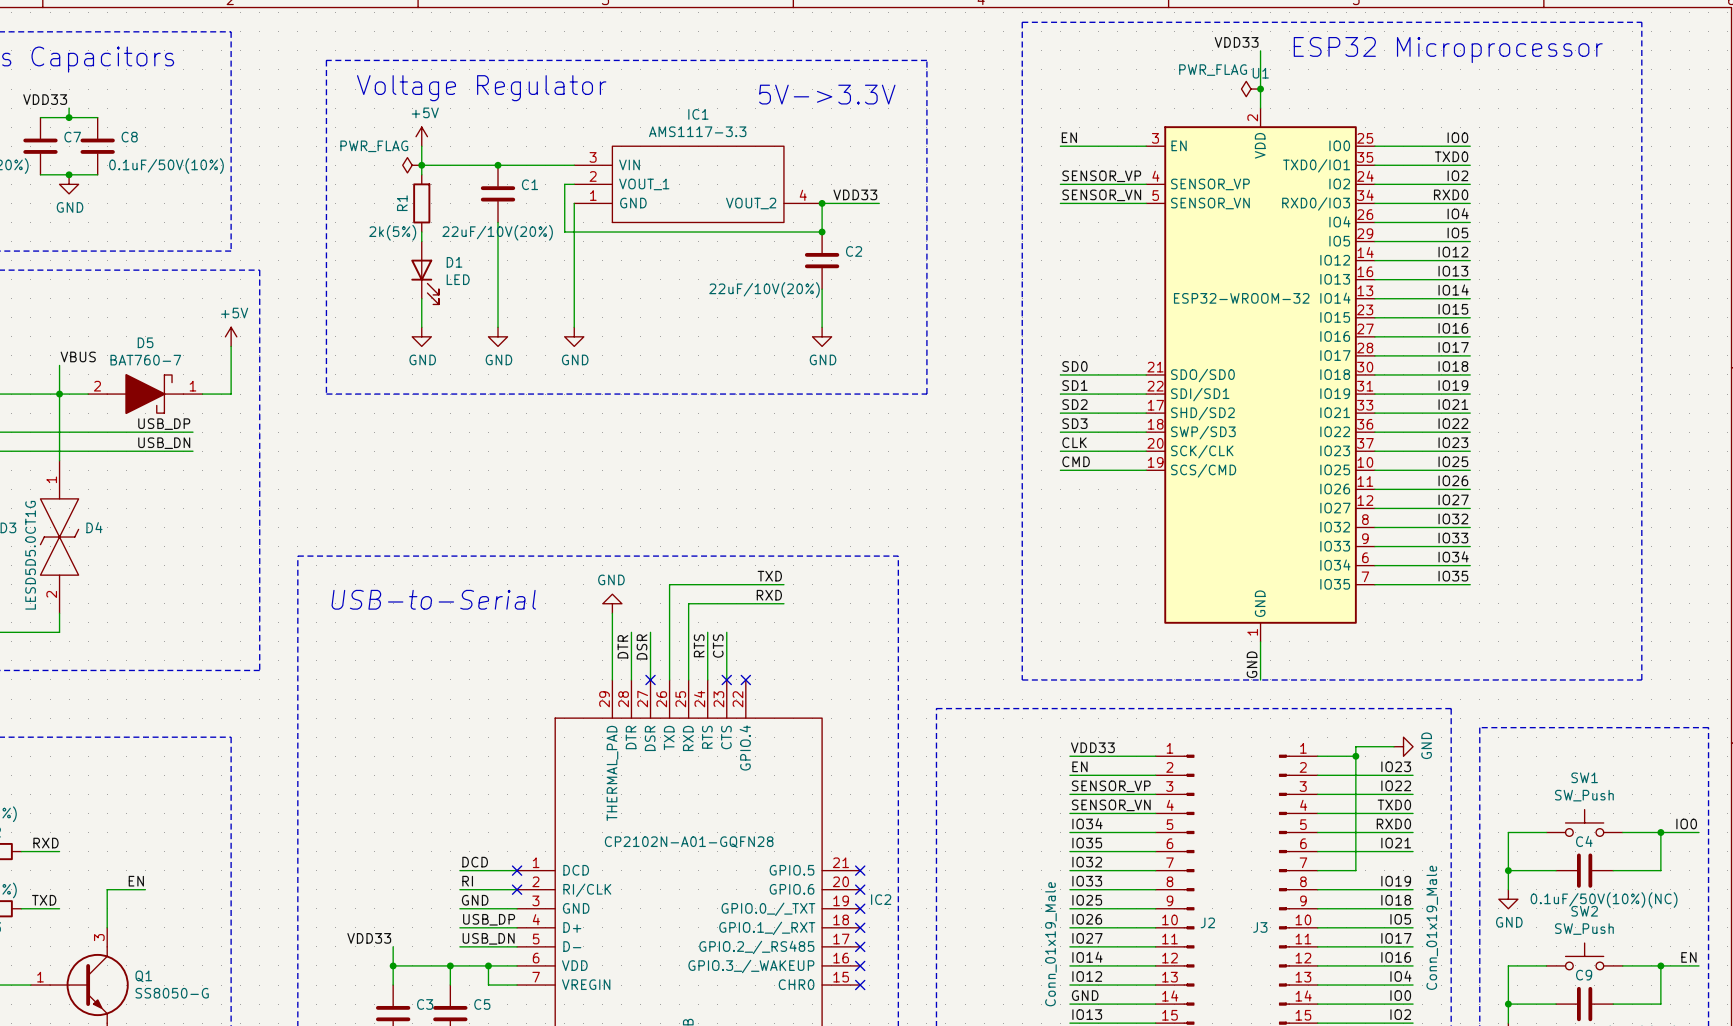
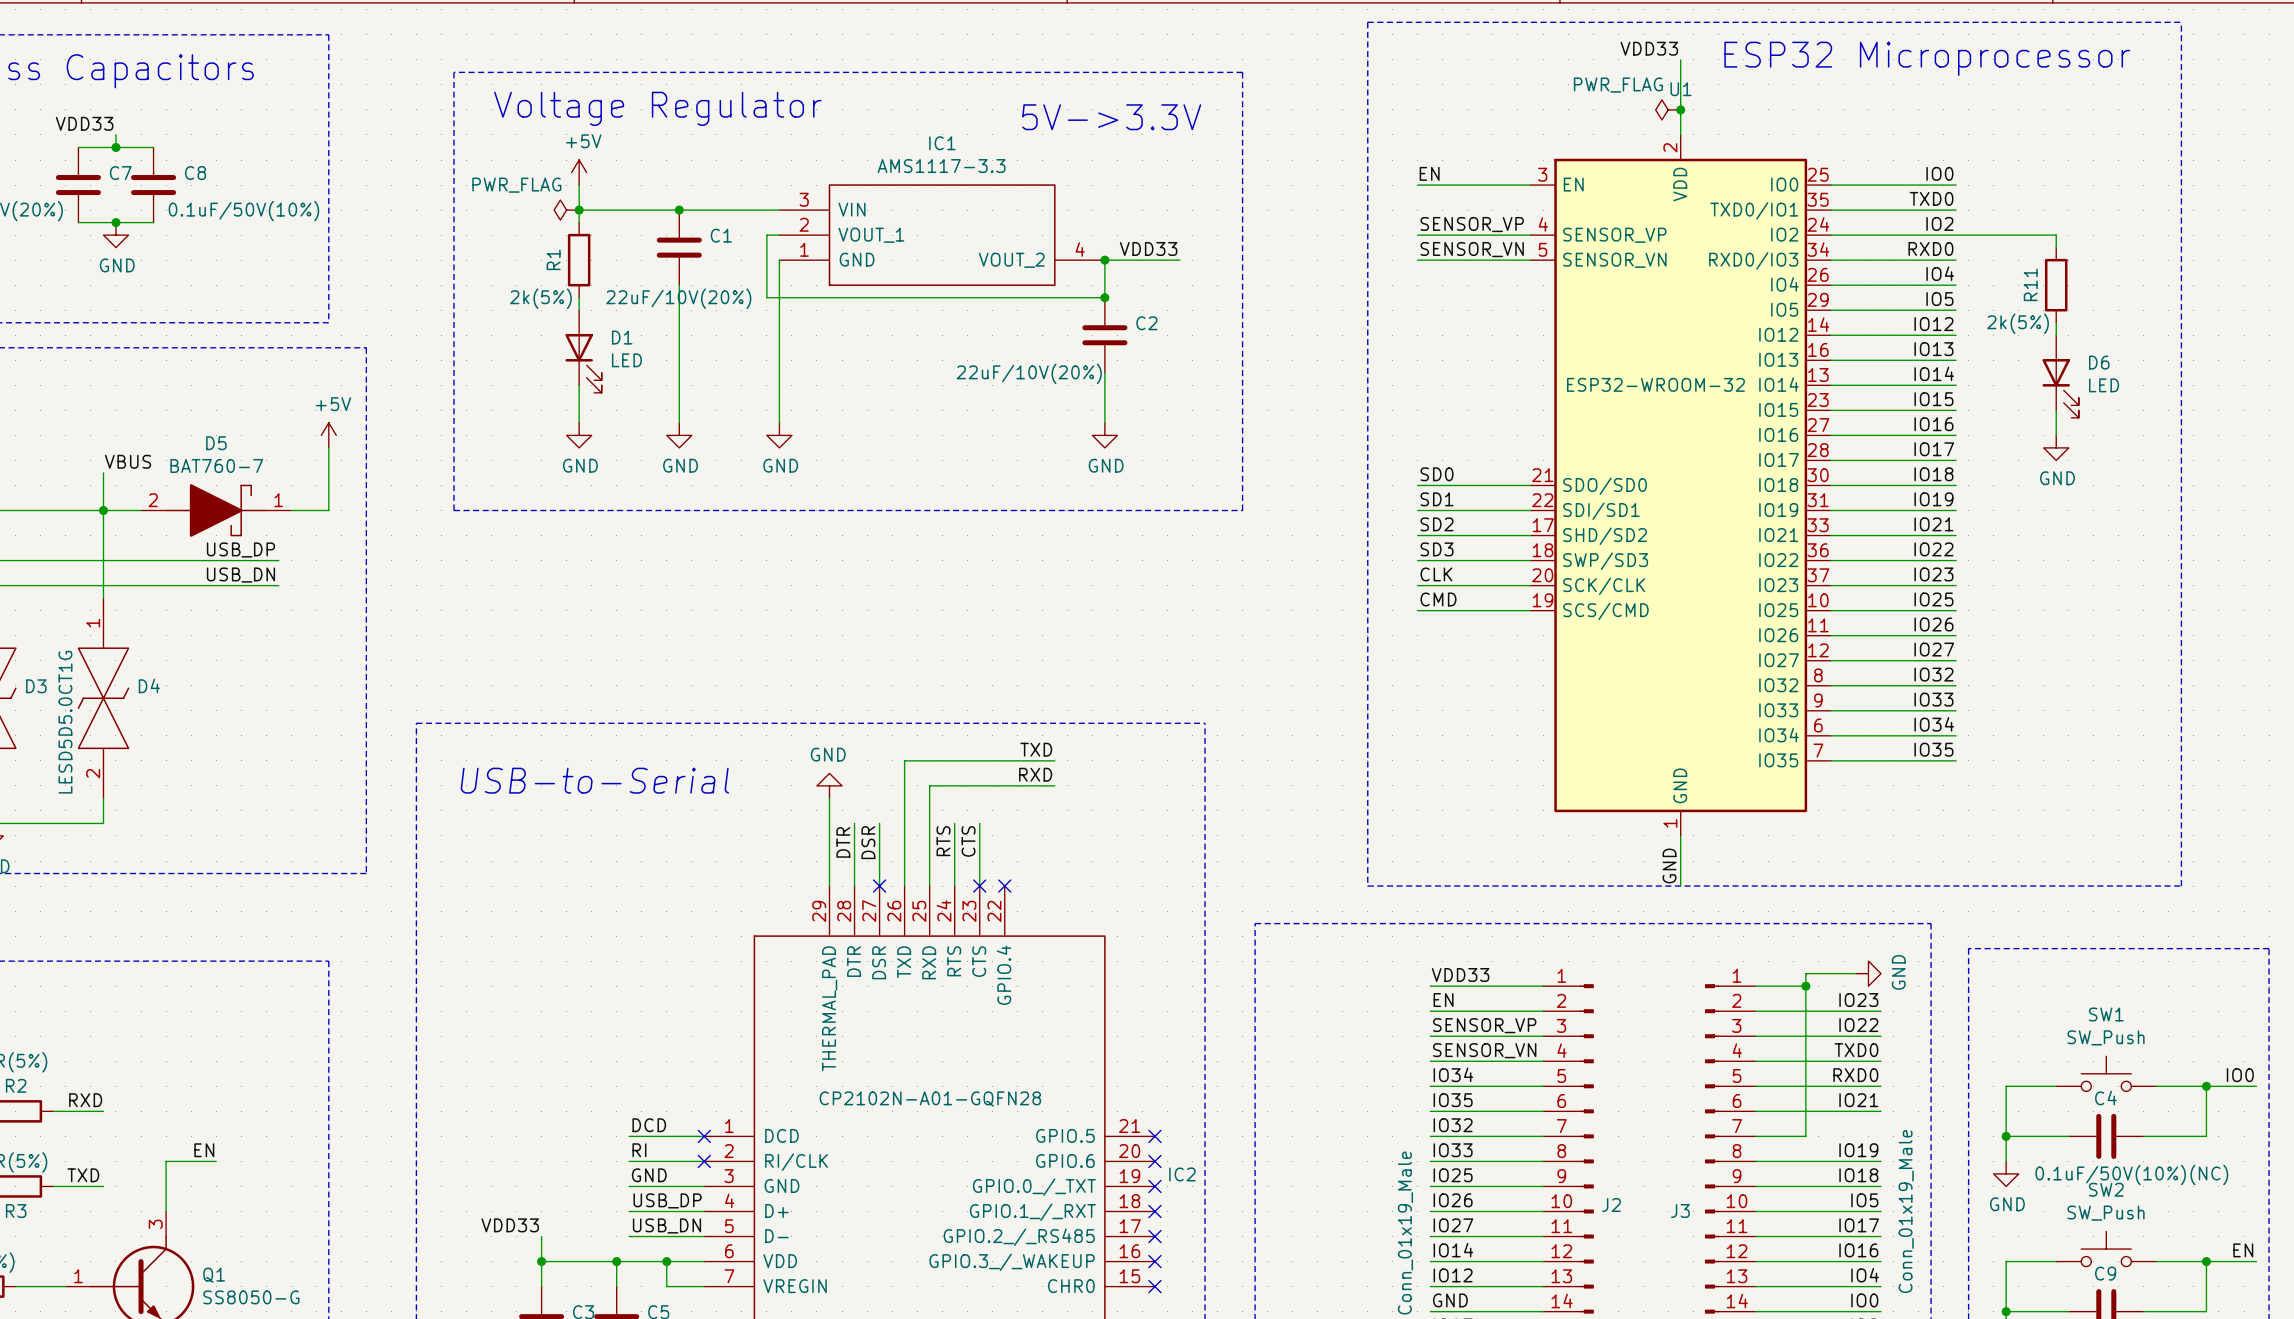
wire: none -> (1956, 235) (2056, 235) (2056, 247)
R11: none -> 2k(5%) (2056, 285)
wire: none -> (2056, 322) (2056, 335)
D6: none -> LED (2060, 376)
wire: none -> (2056, 410) (2056, 435)
power symbol: none -> GND (2056, 447)

